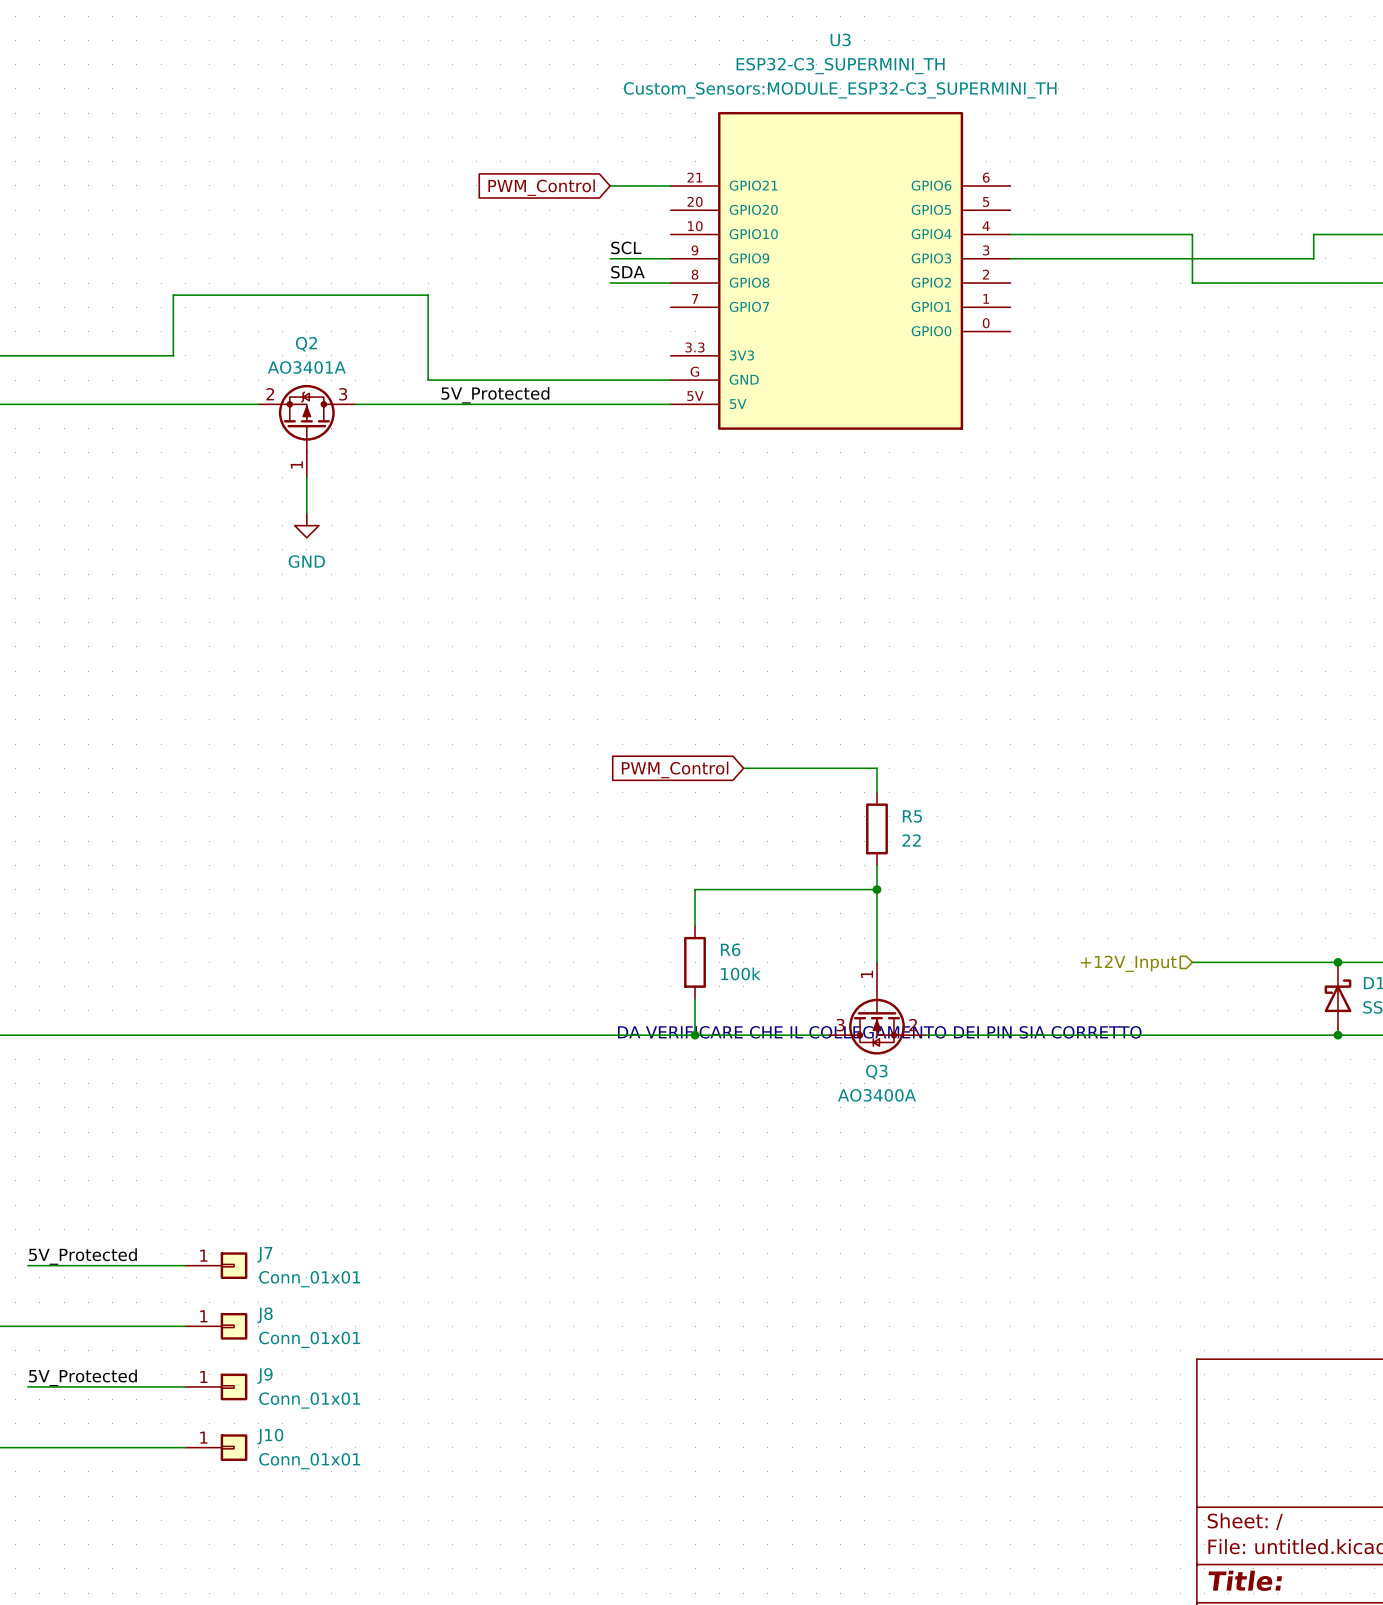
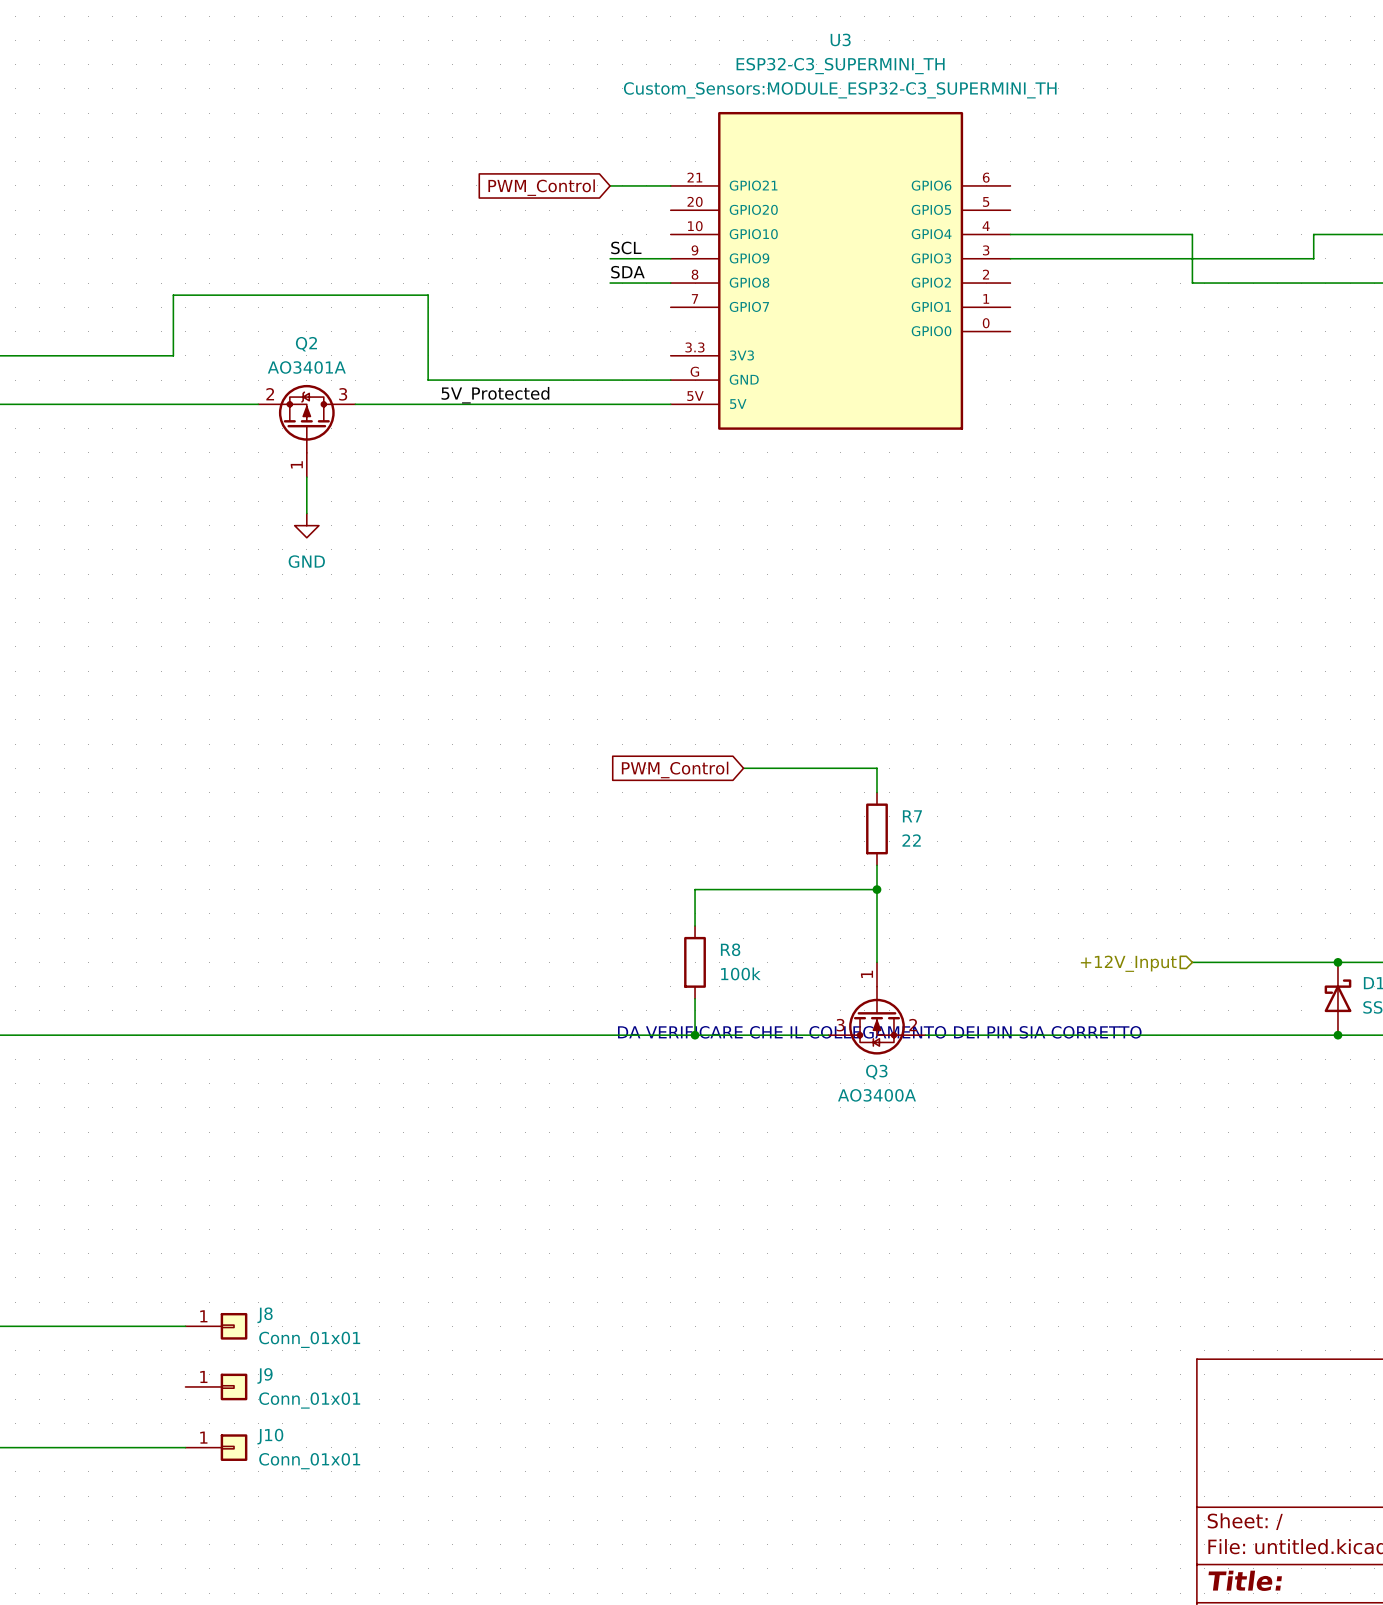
R5 name: R5 (912, 816) -> R7 (912, 816)
R6 name: R6 (730, 949) -> R8 (730, 949)
label: 5V_Protected (82, 1256) -> none
wire: (27, 1265) (185, 1265) -> none
J7: Conn_01x01 (216, 1265) -> none
label: 5V_Protected (82, 1377) -> none
wire: (27, 1386) (185, 1386) -> none

